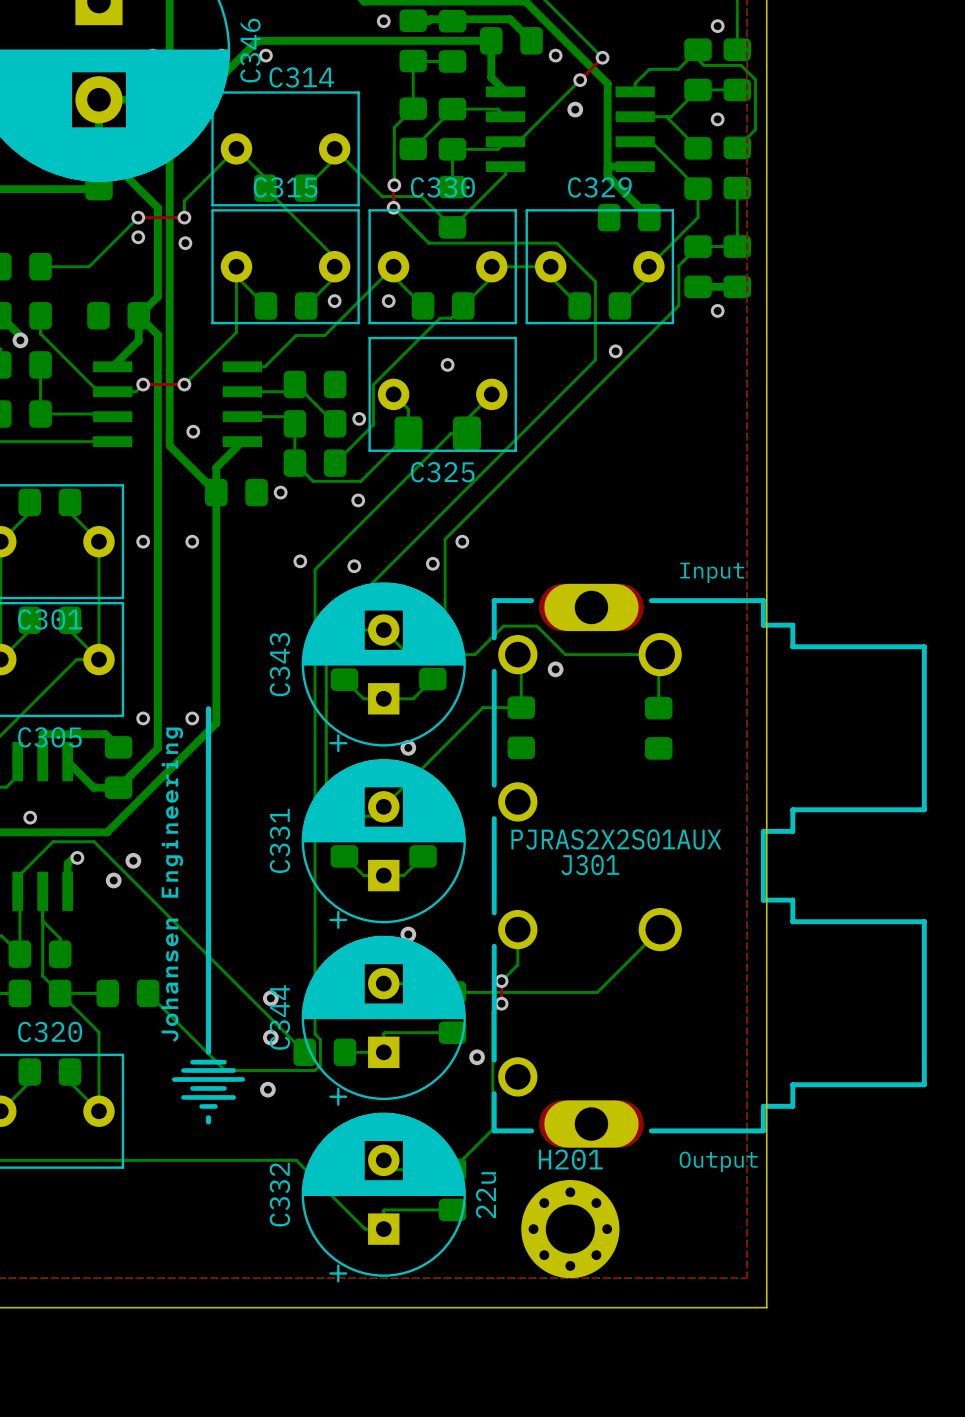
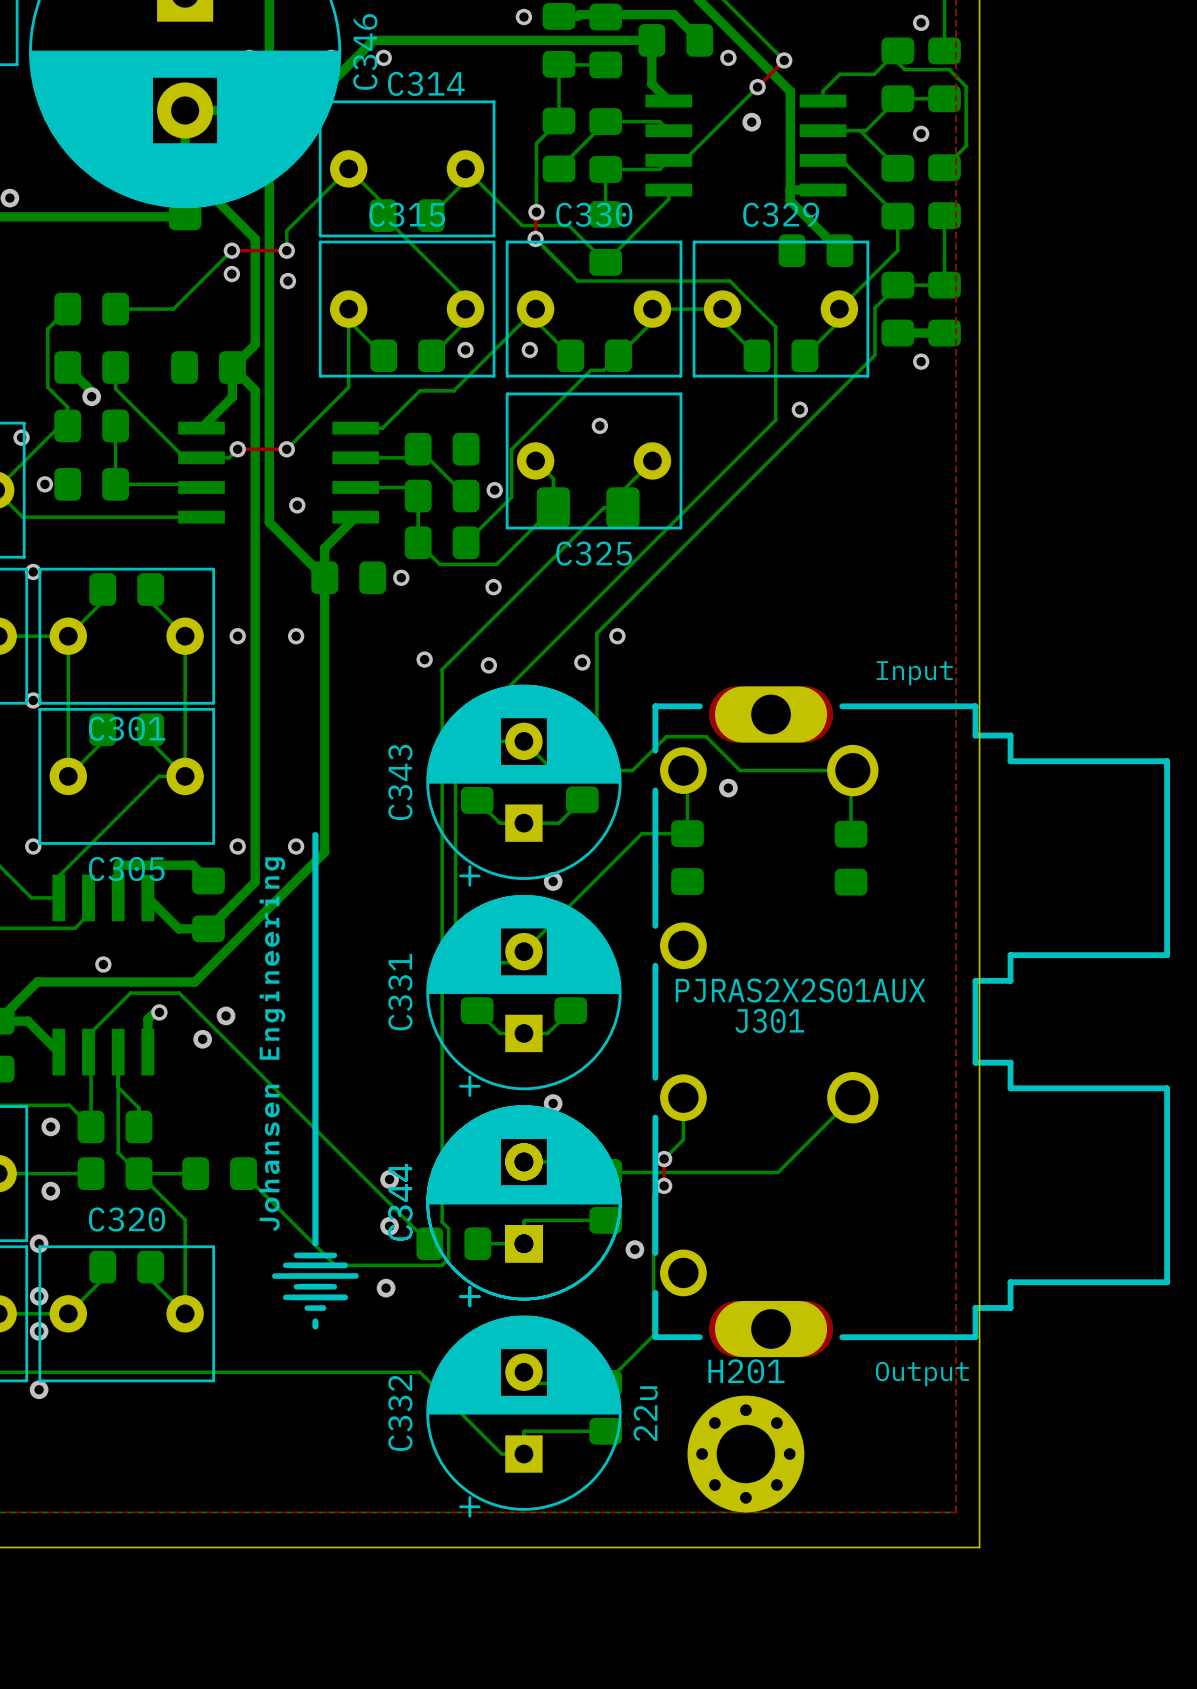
C344: none -> (523, 1206)

